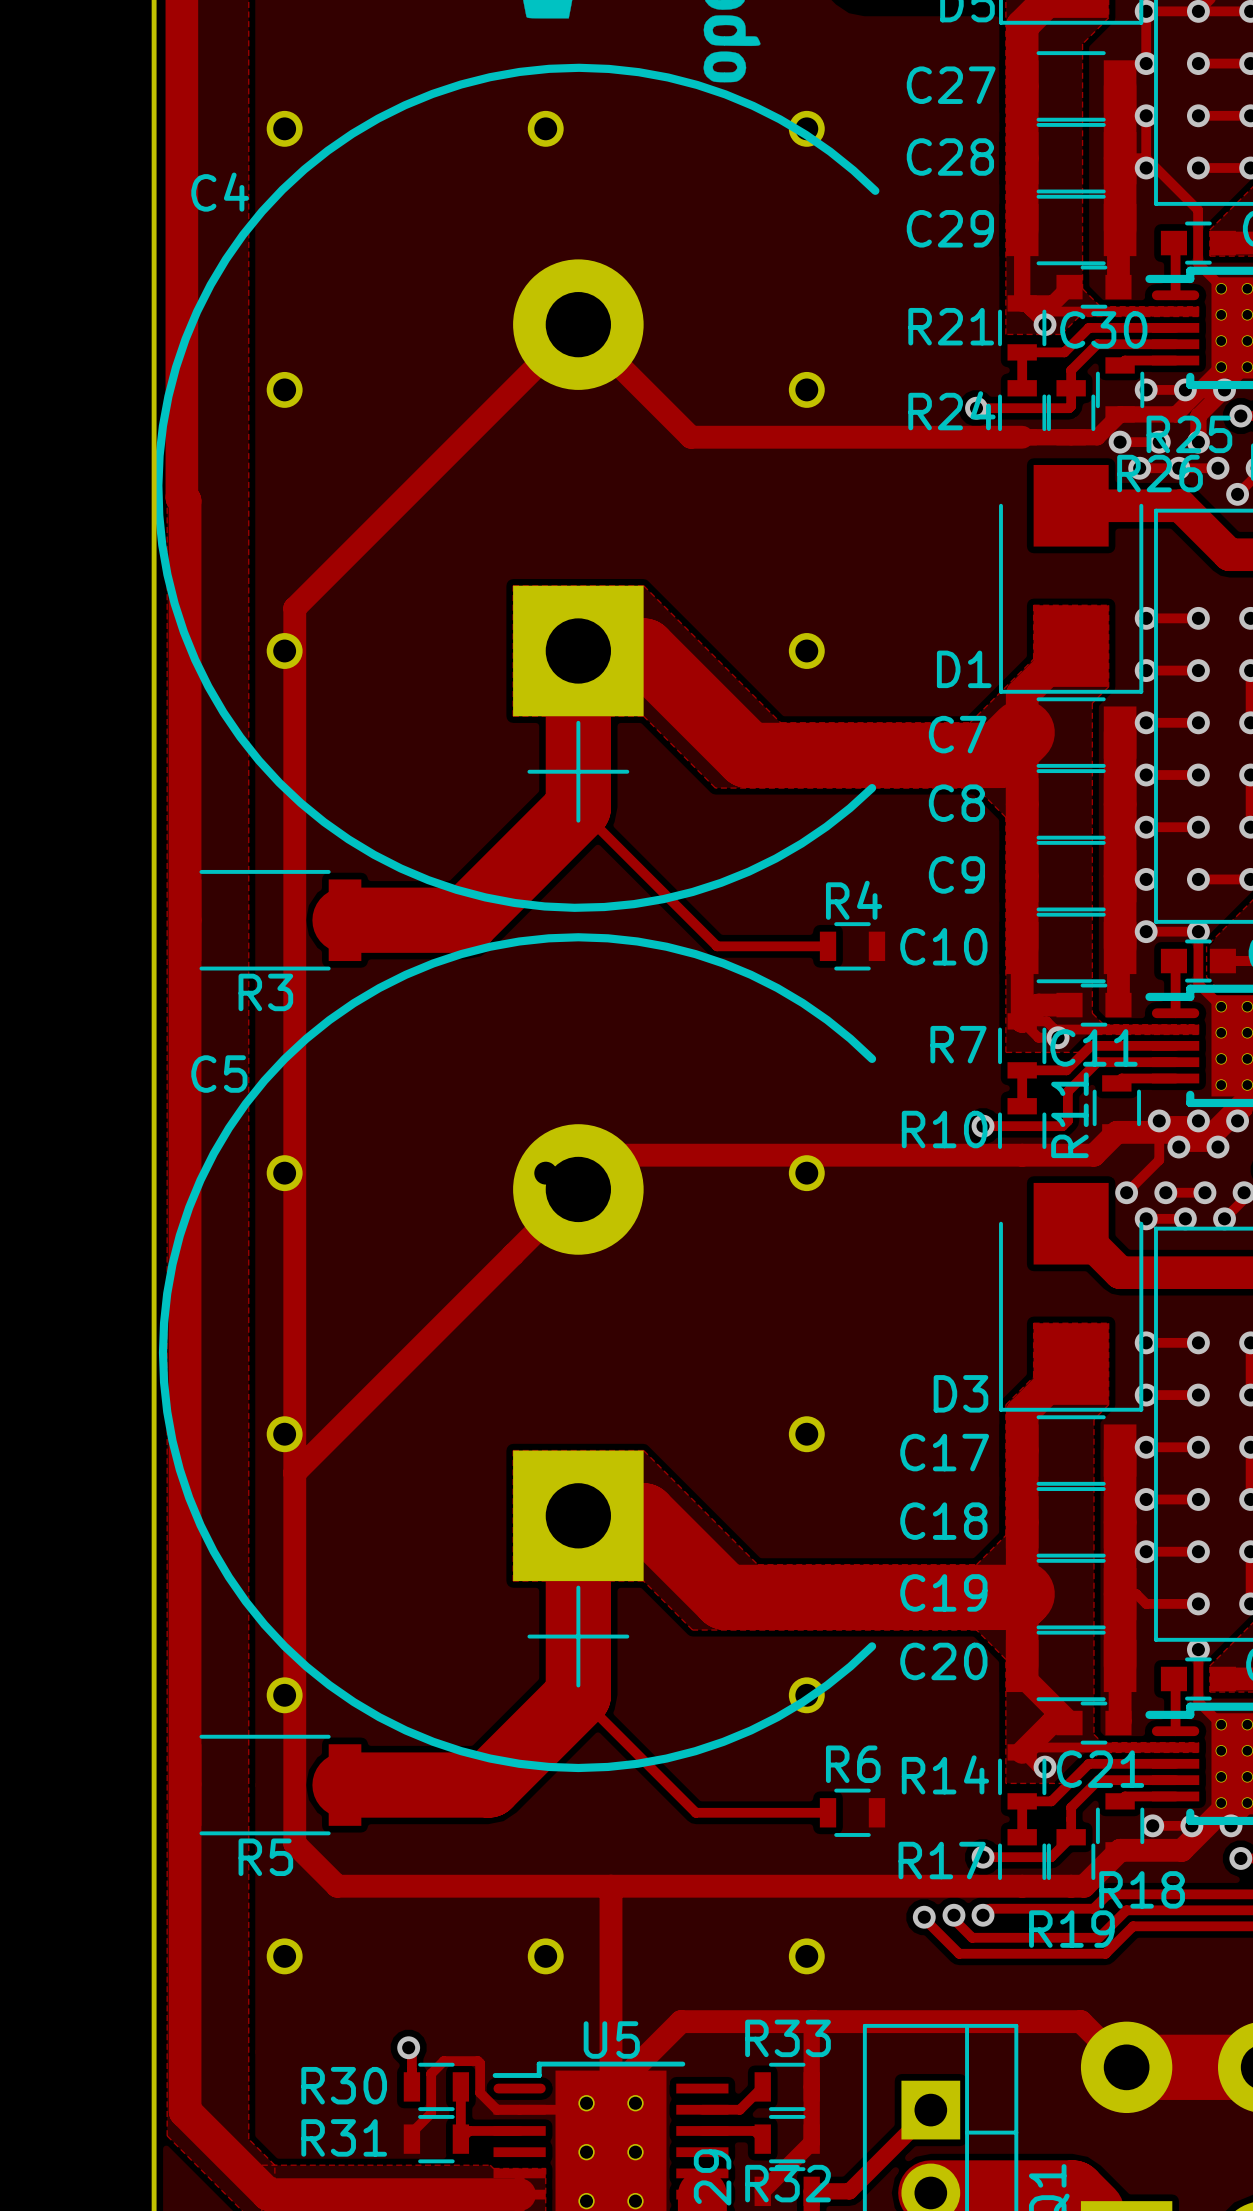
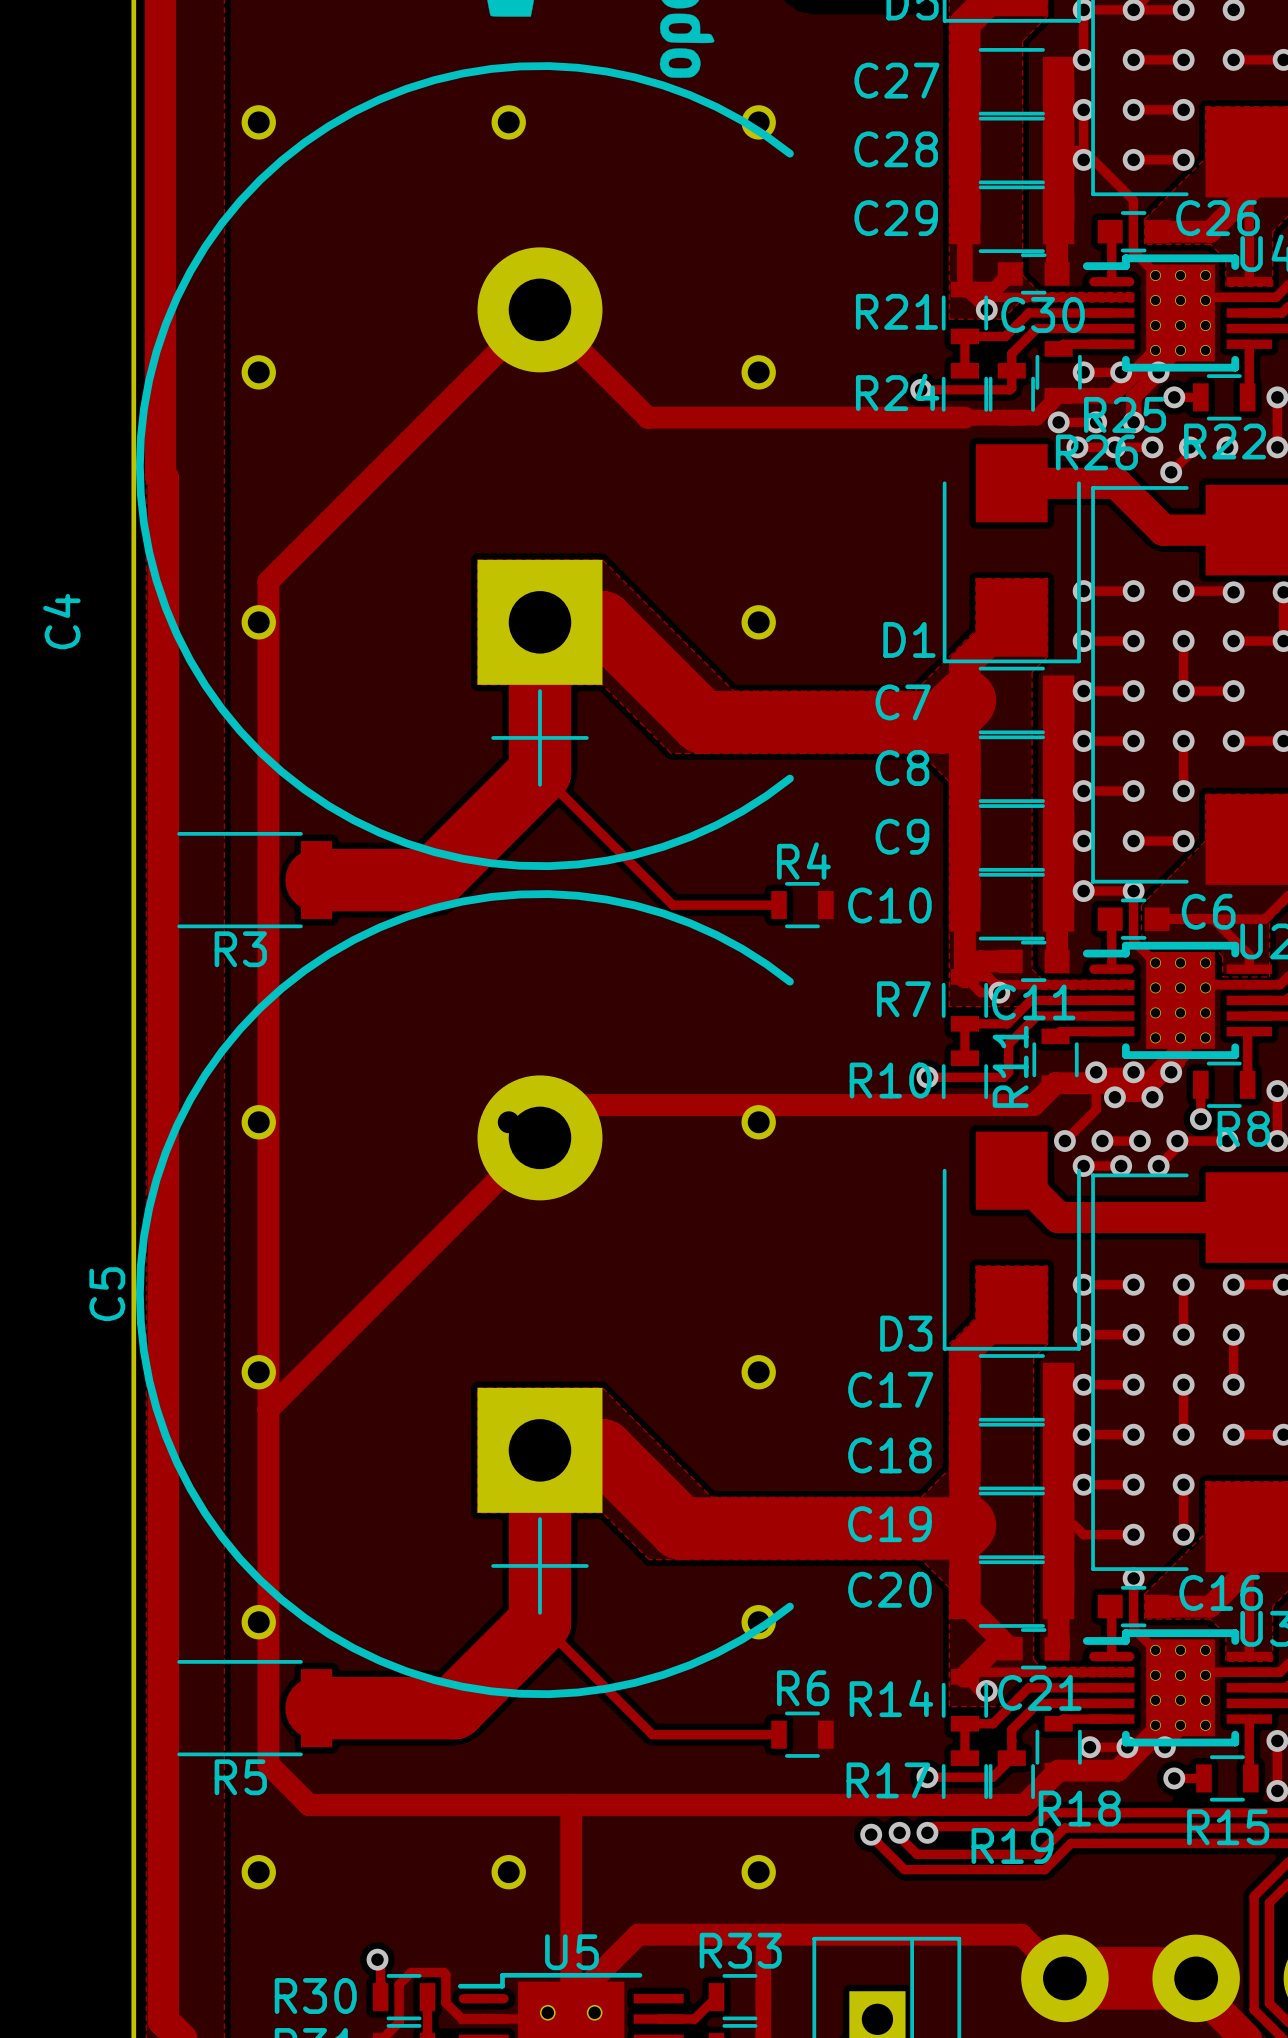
C4 footprint: [154, 63, 880, 912] -> [135, 62, 794, 871]
C4 name position: C4 (220, 192) -> C4 (61, 621)
C5 footprint: [158, 933, 877, 1773] -> [135, 890, 794, 1699]
C5 name position: C5 (219, 1074) -> C5 (107, 1294)

